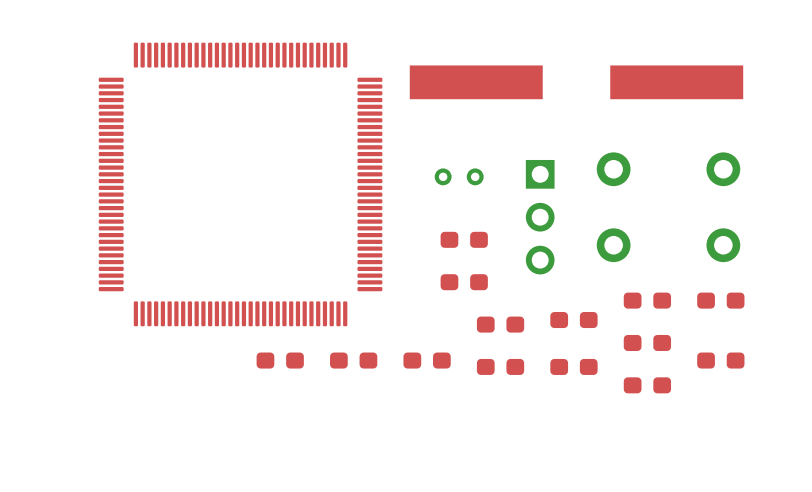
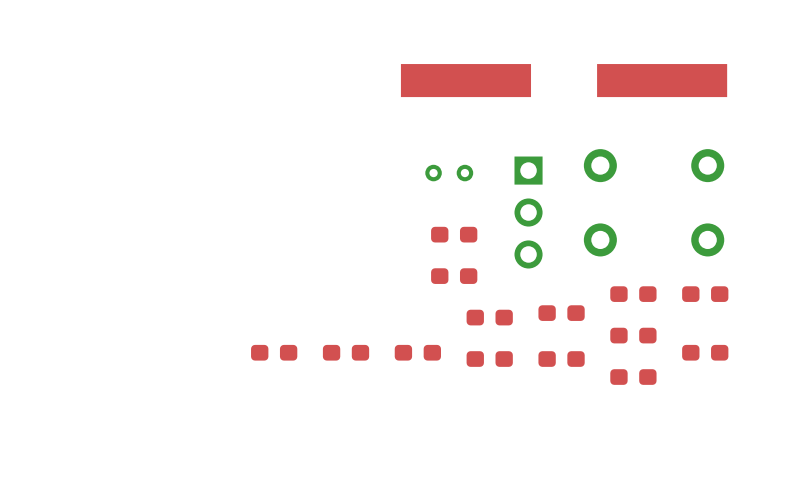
part: (240, 184) -> none

